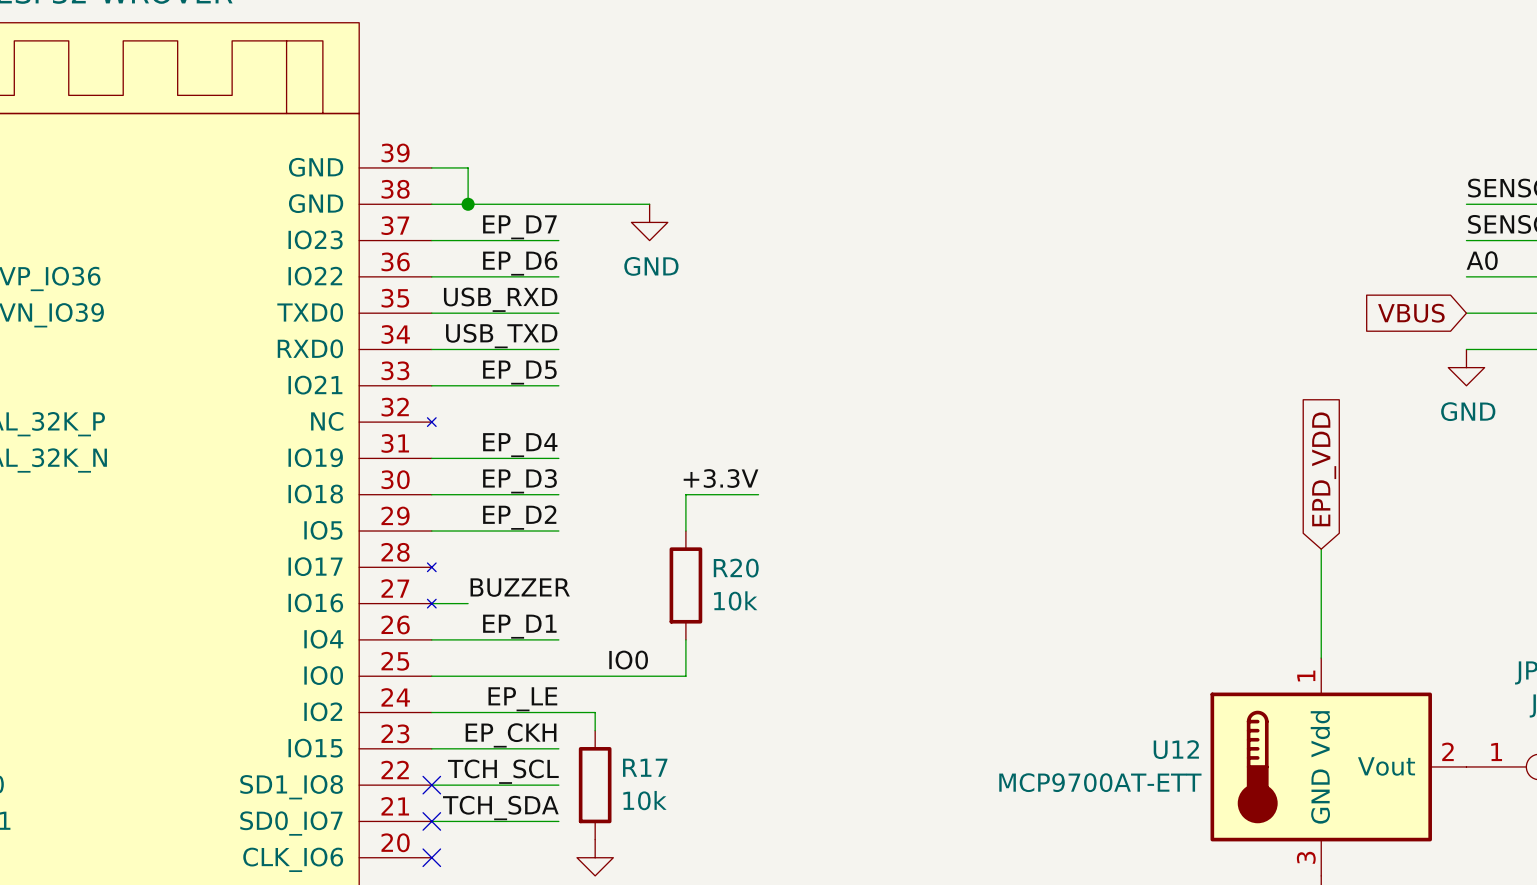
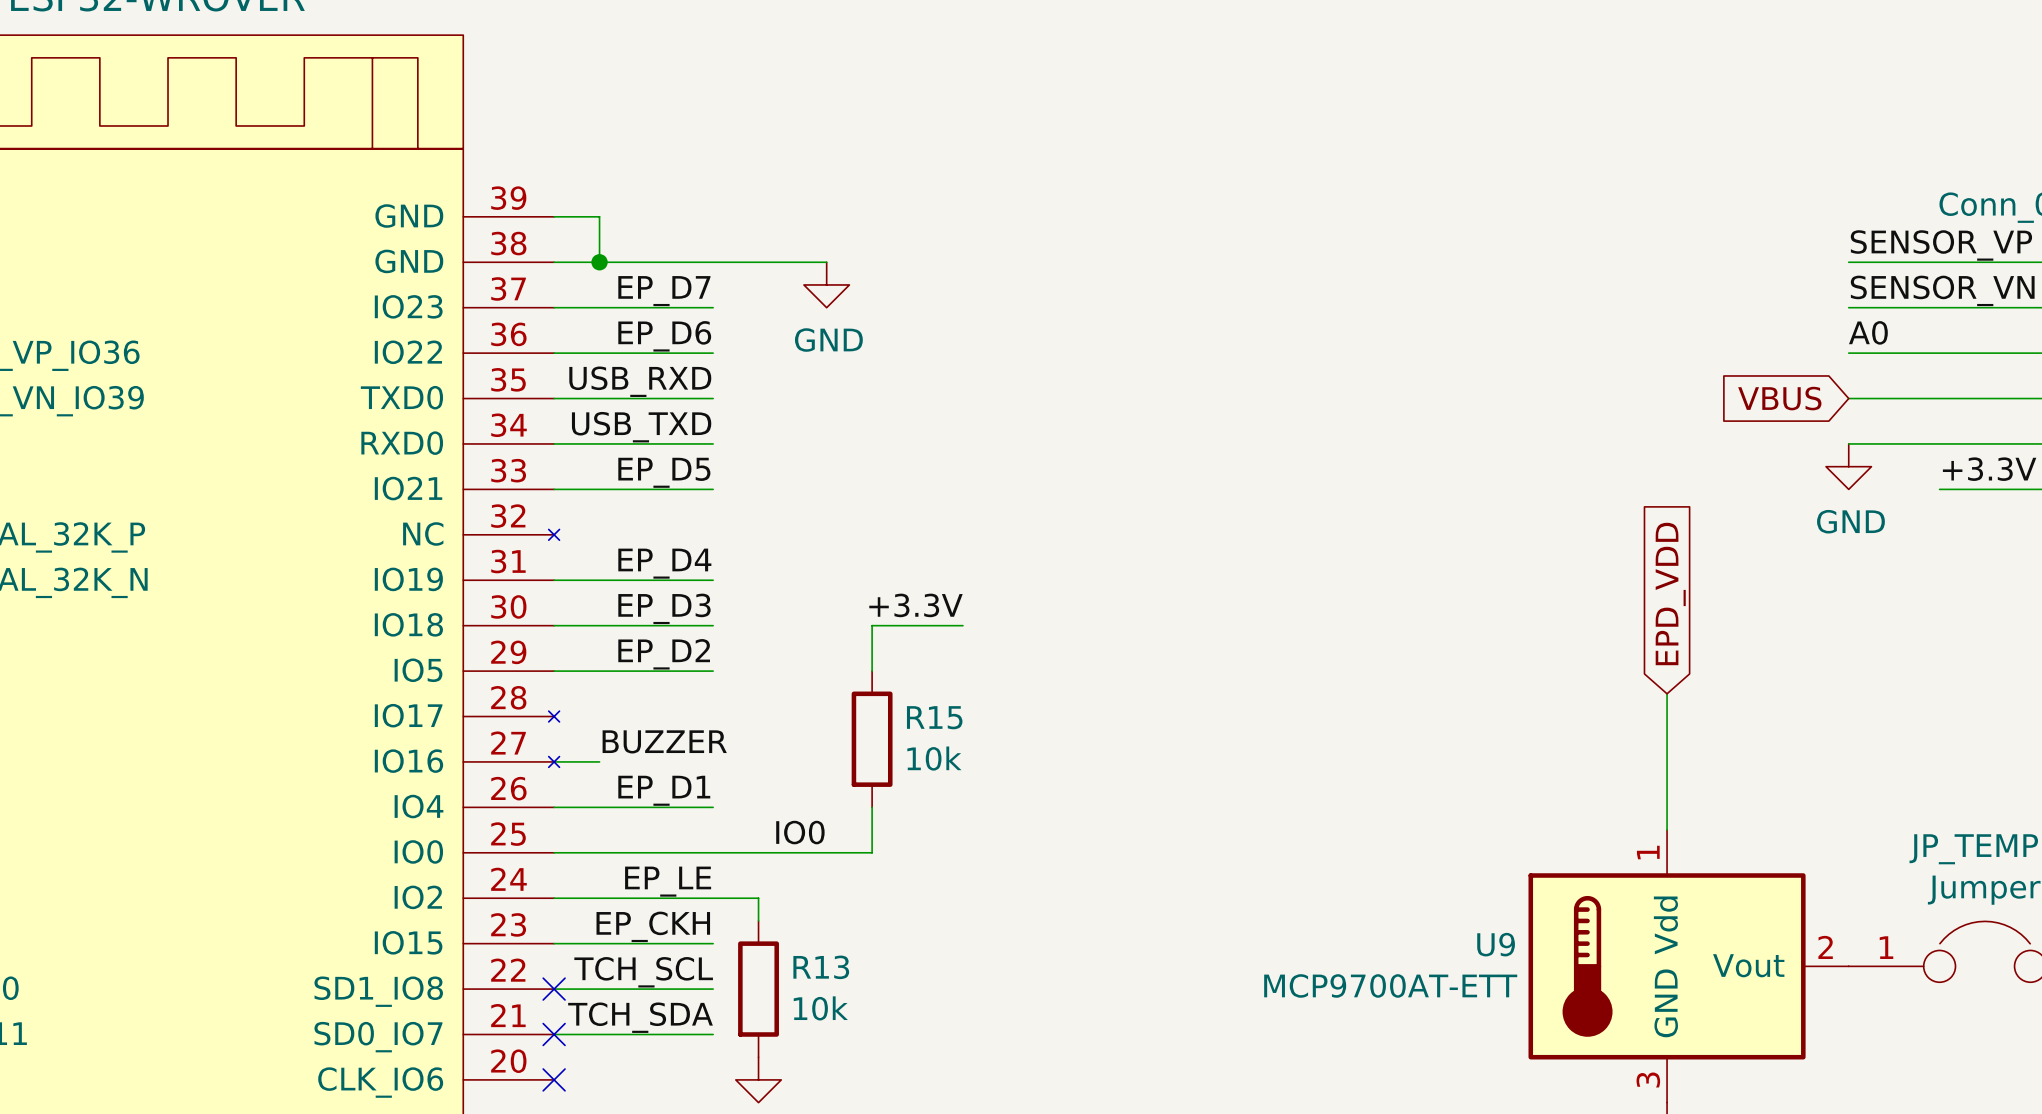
R20 name: R20 (736, 568) -> R15 (934, 717)
U12 name: U12 (1176, 749) -> U9 (1496, 944)
R17 name: R17 (645, 767) -> R13 (821, 967)

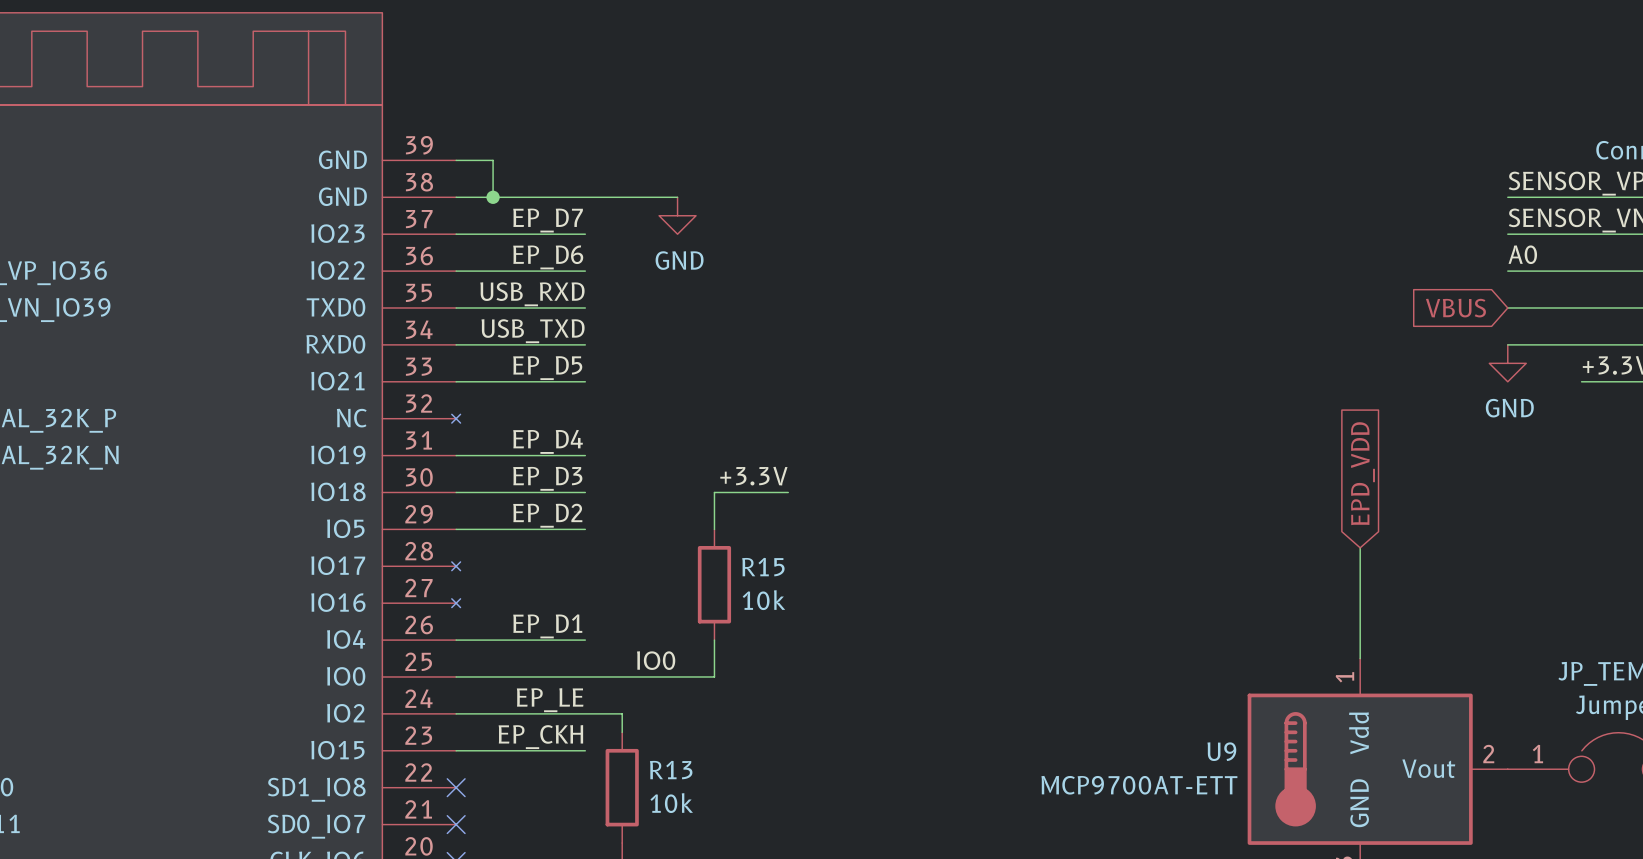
label: BUZZER (664, 741) -> none
wire: (554, 761) (599, 761) -> none
label: TCH_SCL (643, 972) -> none
wire: (554, 989) (713, 989) -> none
label: TCH_SDA (640, 1017) -> none
wire: (554, 1034) (713, 1034) -> none

